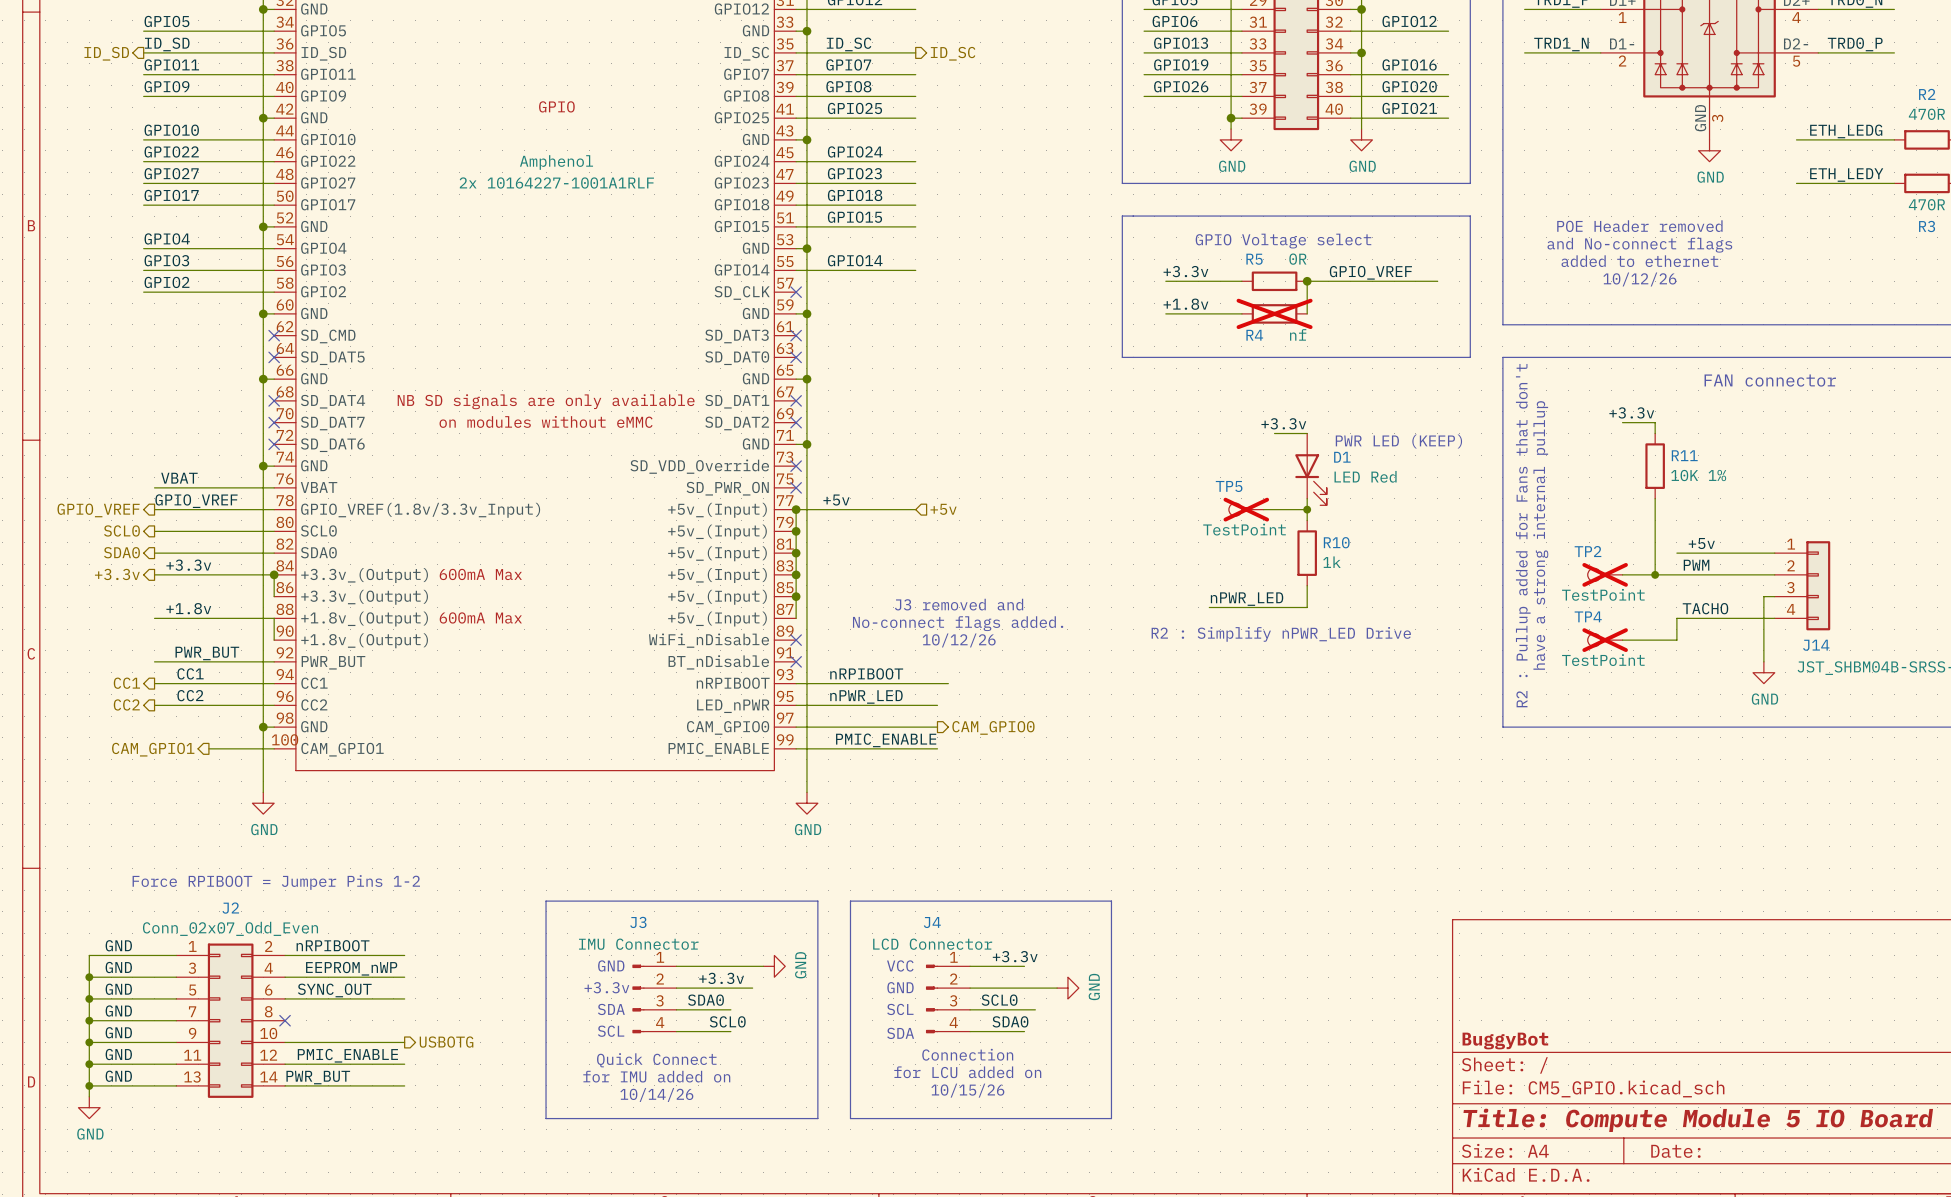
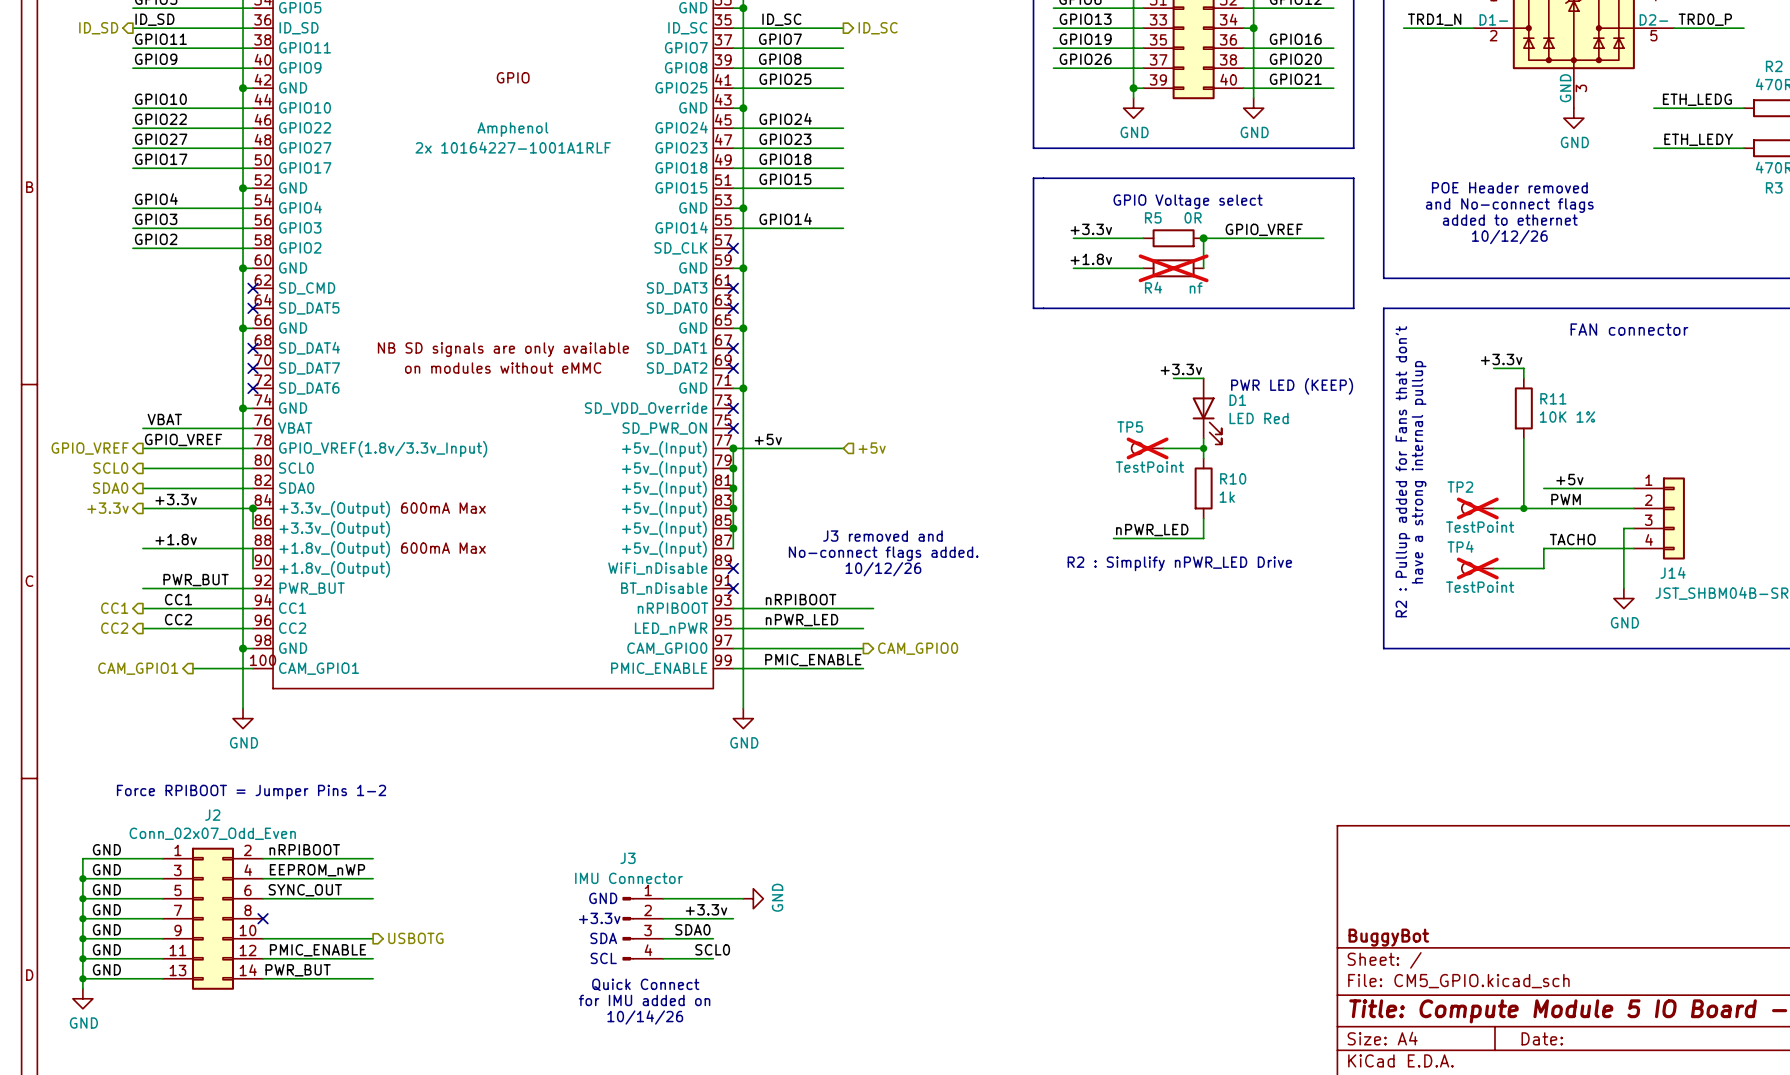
line: (546, 901) (817, 901) (817, 1118) (546, 1118) (546, 901) -> none
line: (850, 901) (1111, 901) (1111, 1118) (850, 1118) (850, 901) -> none
label: +3.3v (1015, 956) -> none
text position: GND (611, 965) -> GND (603, 898)
text: VCC (900, 965) -> none
wire: (676, 966) (763, 966) -> (663, 898) (743, 898)
power symbol position: GND (774, 966) -> GND (753, 898)
wire: (970, 966) (1024, 966) -> none
label position: +3.3v (721, 978) -> +3.3v (706, 909)
text position: +3.3v (606, 987) -> +3.3v (599, 918)
text: GND (900, 987) -> none
wire: (676, 988) (752, 988) -> (663, 918) (733, 918)
wire: (970, 988) (1057, 988) -> none
power symbol: GND (1067, 988) -> none
J3 position: (654, 998) -> (642, 928)
J4: LCD Connector (948, 998) -> none
label position: SDA0 (705, 1000) -> SDA0 (692, 929)
label: SCL0 (999, 1000) -> none
text position: SDA (611, 1009) -> SDA (603, 938)
wire: (676, 1009) (730, 1009) -> (663, 938) (713, 938)
text: SCL (900, 1009) -> none
wire: (970, 1009) (1035, 1009) -> none
label position: SCL0 (727, 1021) -> SCL0 (712, 949)
label: SDA0 (1010, 1021) -> none
text position: SCL (611, 1031) -> SCL (603, 958)
wire: (676, 1031) (730, 1031) -> (663, 958) (713, 958)
wire: (970, 1031) (1024, 1031) -> none
text: SDA (900, 1033) -> none
text: Connection (967, 1054) -> none
text position: Quick Connect (656, 1060) -> Quick Connect (645, 984)
text: for LCU added on (967, 1072) -> none
text position: for IMU added on (656, 1076) -> for IMU added on (644, 1000)
text: 10/15/26 (967, 1090) -> none
text position: 10/14/26 (656, 1094) -> 10/14/26 (645, 1017)

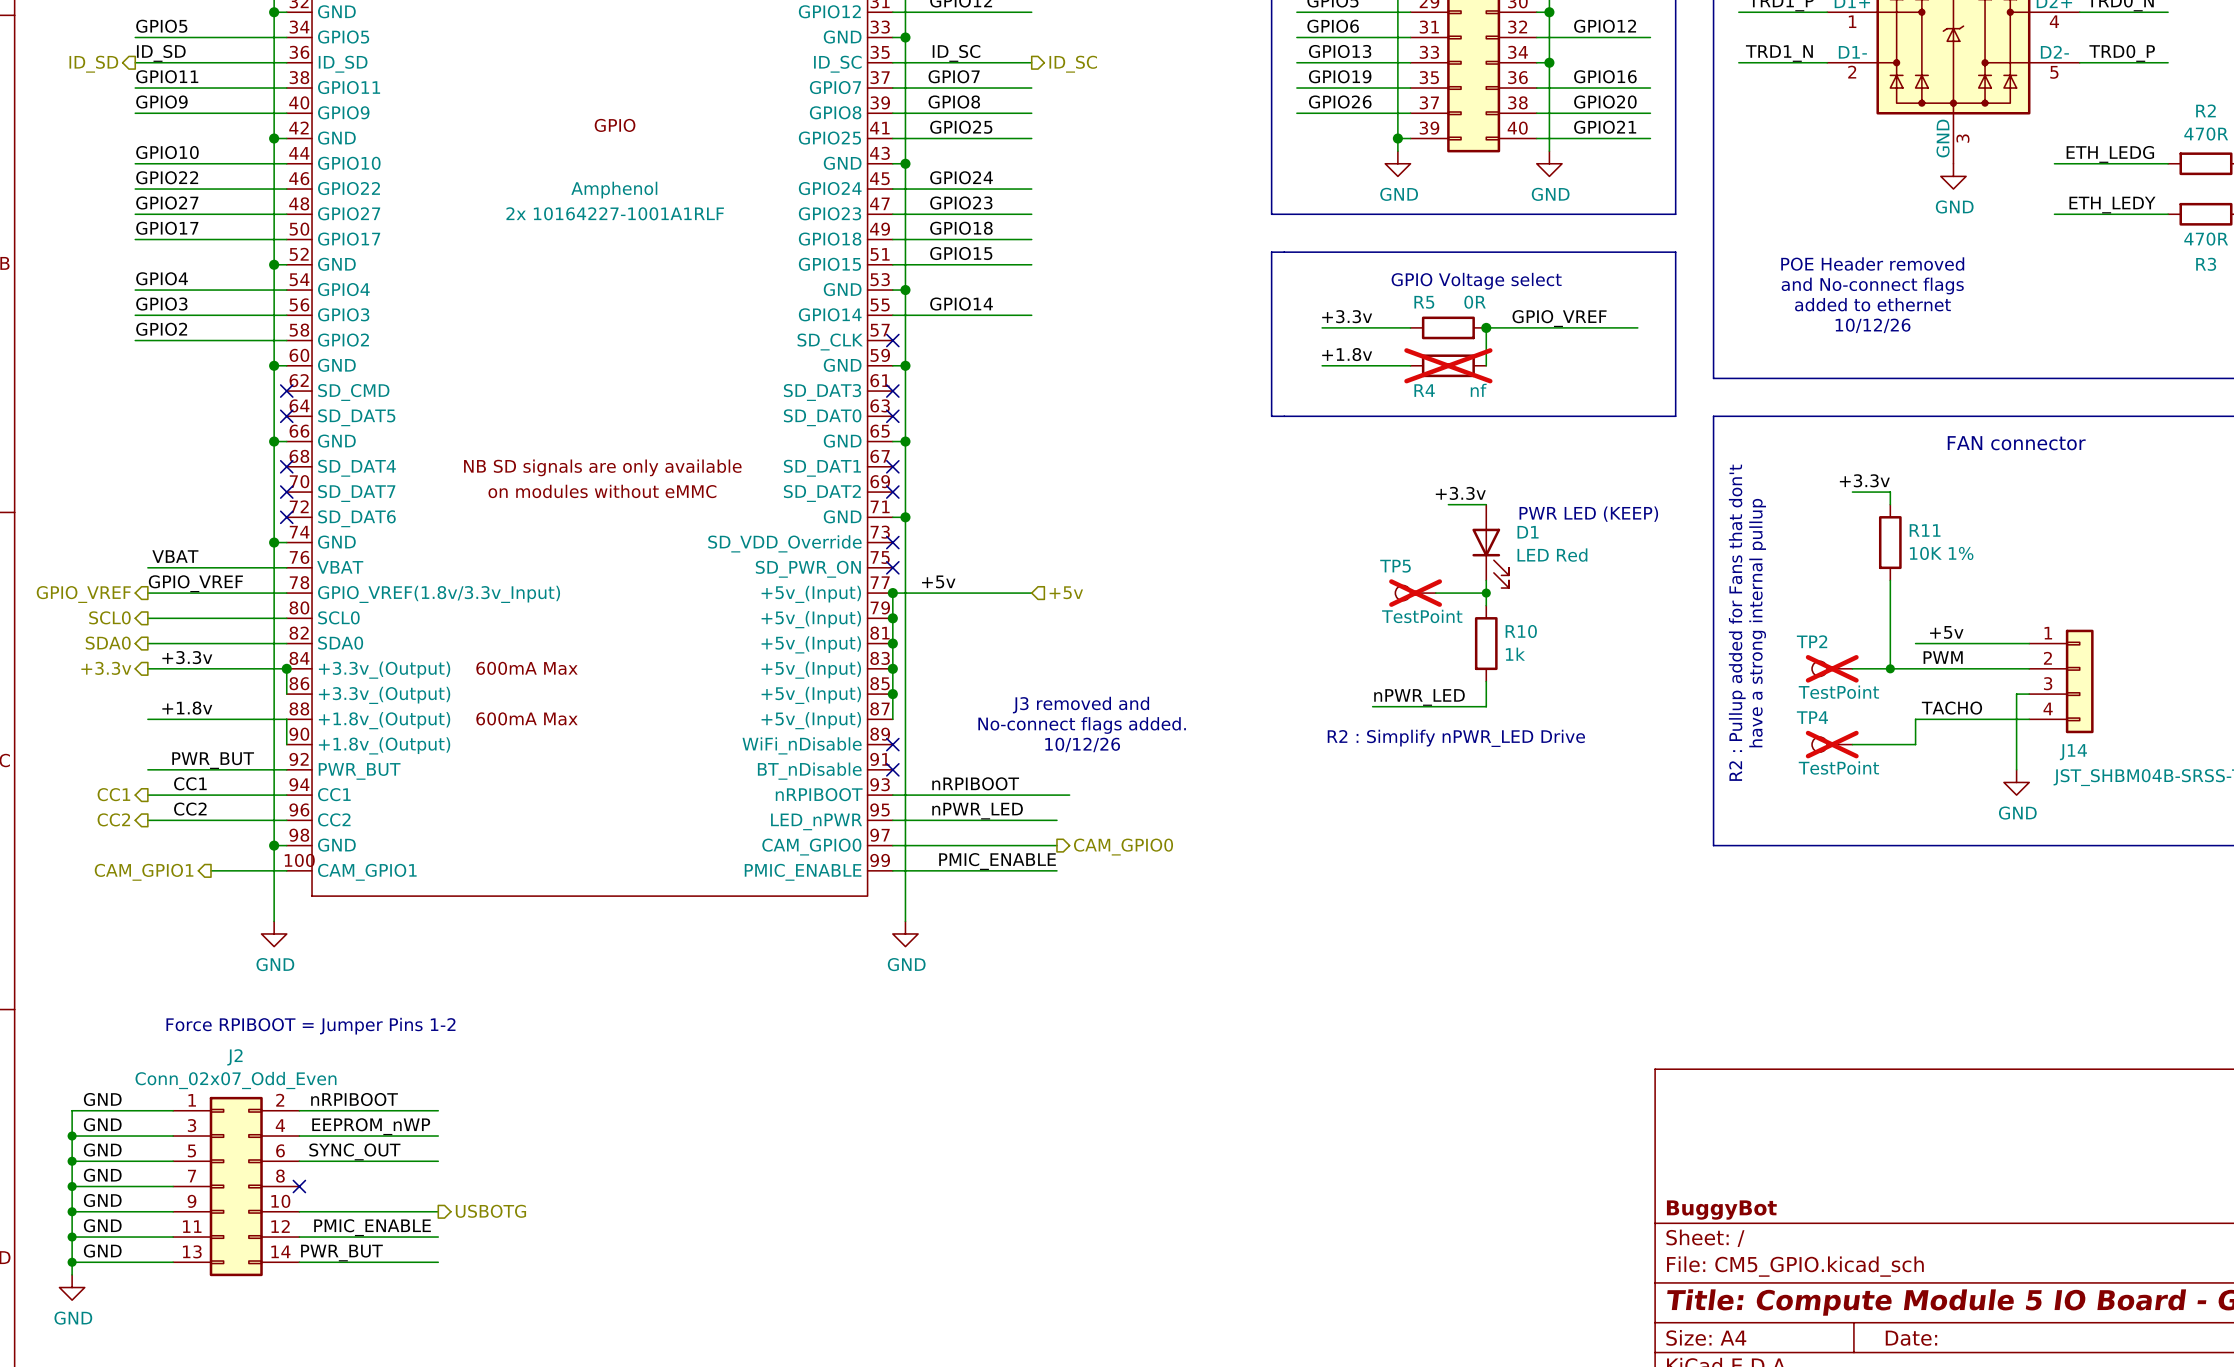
text: GND (603, 898) -> none
wire: (663, 898) (743, 898) -> none
power symbol: GND (753, 898) -> none
label: +3.3v (706, 909) -> none
text: +3.3v (599, 918) -> none
wire: (663, 918) (733, 918) -> none
J3: IMU Connector (642, 928) -> none
label: SDA0 (692, 929) -> none
text: SDA (603, 938) -> none
wire: (663, 938) (713, 938) -> none
label: SCL0 (712, 949) -> none
text: SCL (603, 958) -> none
wire: (663, 958) (713, 958) -> none
text: Quick Connect (645, 984) -> none
text: for IMU added on (644, 1000) -> none
text: 10/14/26 (645, 1017) -> none

